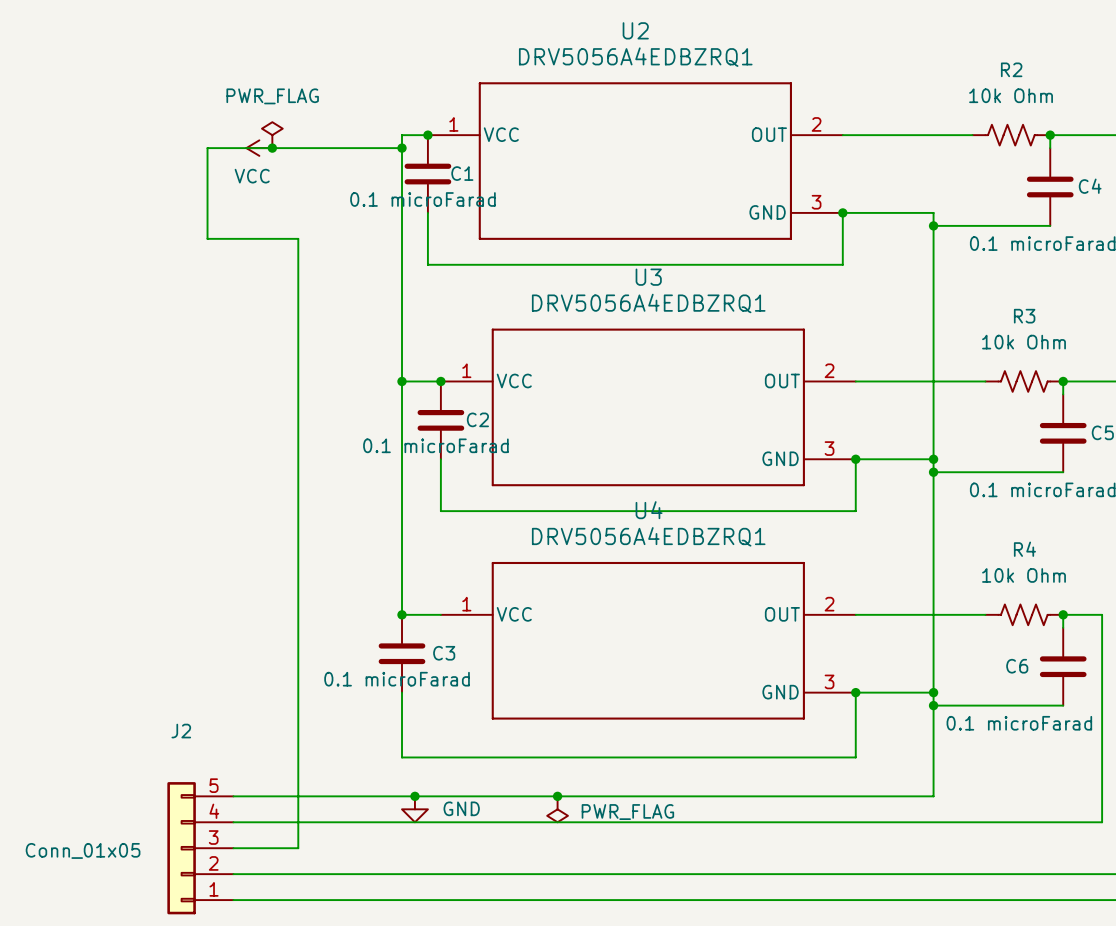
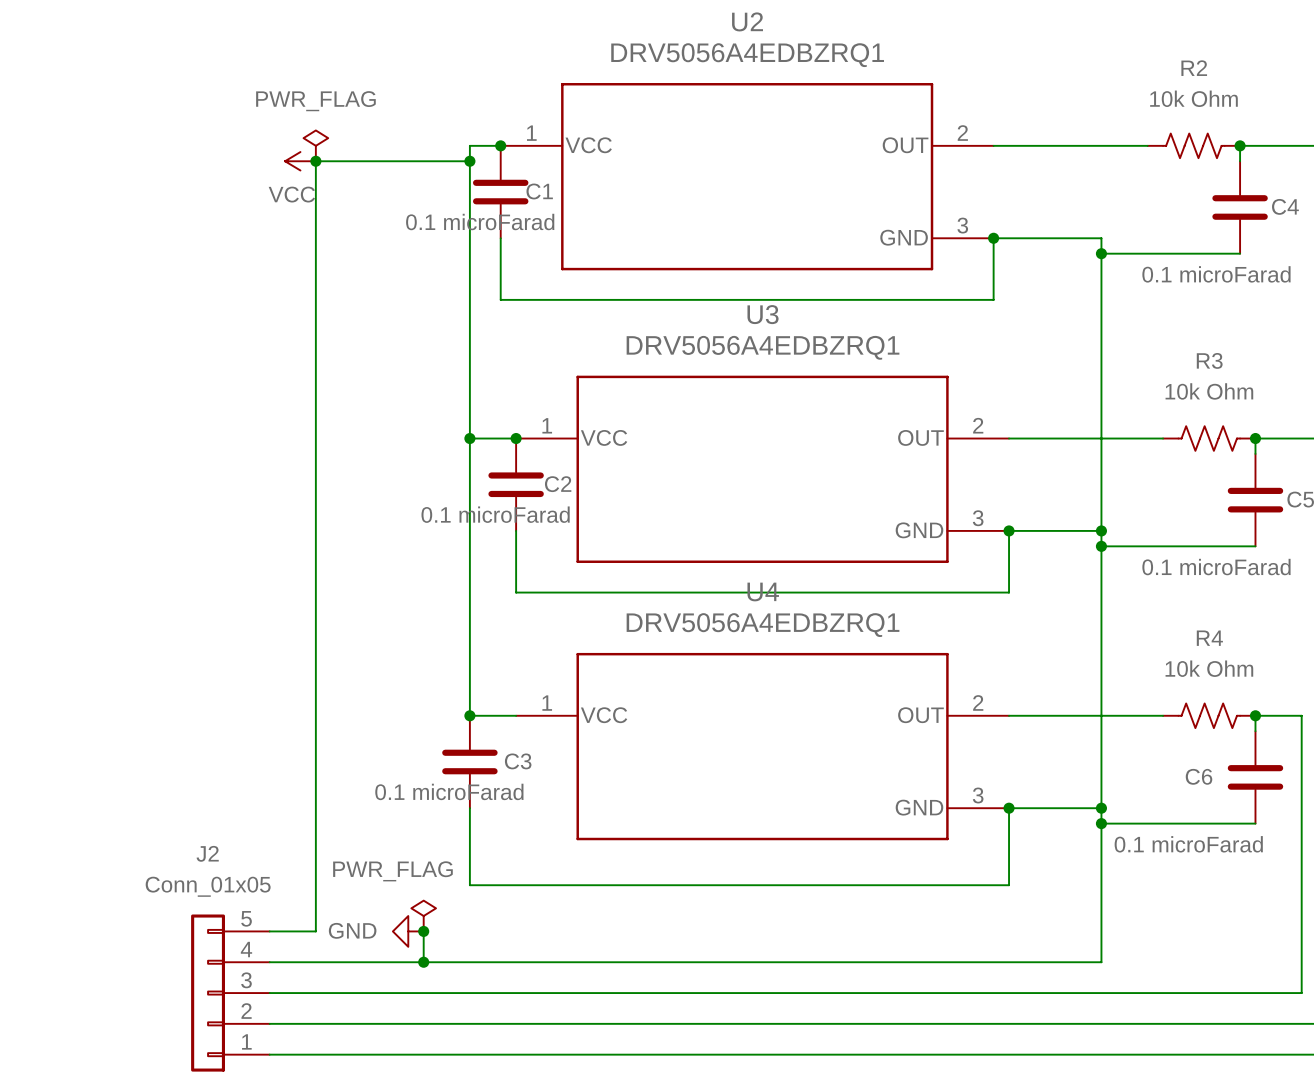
wire: (272, 148) (207, 148) (207, 238) (298, 238) (298, 848) -> (315, 161) (315, 931)
wire: (272, 796) (933, 796) -> none
wire: none -> (423, 931) (423, 962)
junction: none -> (423, 931)
junction: (414, 796) -> none
junction: (557, 796) -> none
power symbol text position: GND (461, 808) -> GND (352, 930)
power symbol rotation: 0° (414, 809) -> 90° clockwise (408, 931)
power symbol position: GND (414, 809) -> GND (408, 931)
power symbol rotation: 0° (557, 809) -> 180° (423, 916)
power symbol position: PWR_FLAG (557, 809) -> PWR_FLAG (423, 916)
power symbol text position: PWR_FLAG (627, 812) -> PWR_FLAG (392, 871)
junction: none -> (423, 962)
wire: (933, 822) (1102, 822) -> (1101, 962) (1101, 931)
wire: none -> (1301, 962) (1301, 993) (346, 993)
J2 value position: Conn_01x05 (83, 850) -> Conn_01x05 (208, 886)

